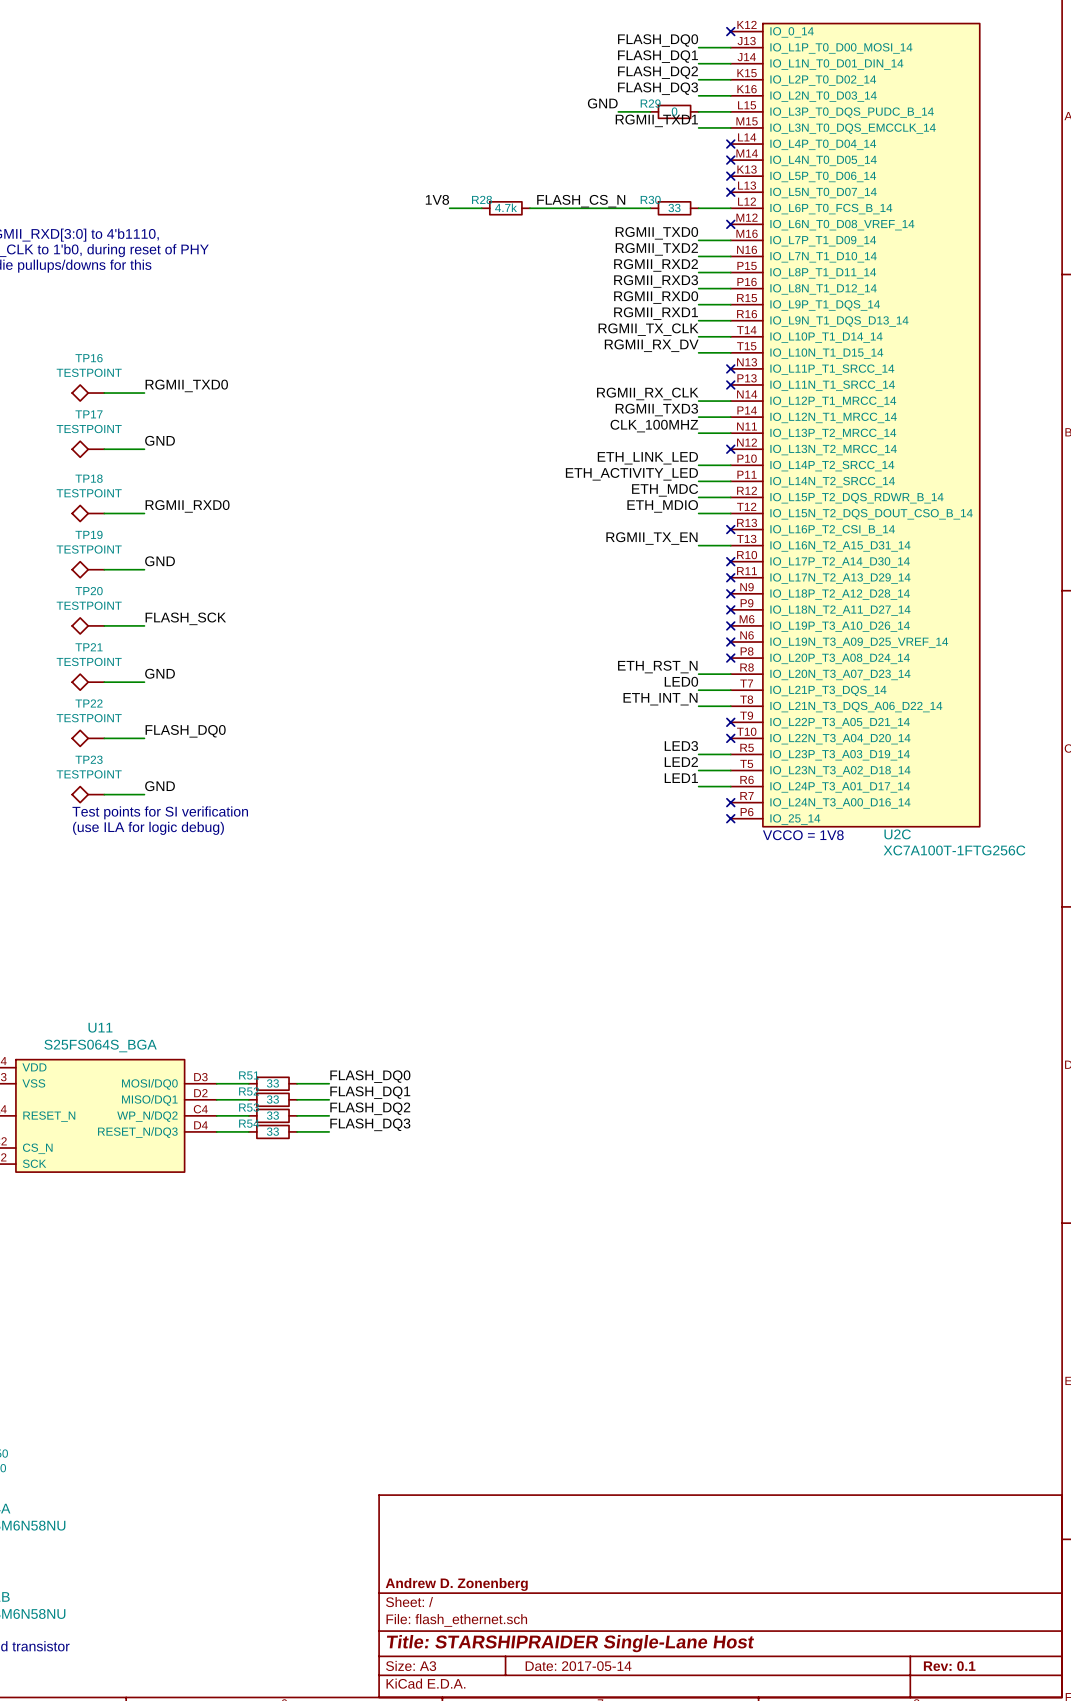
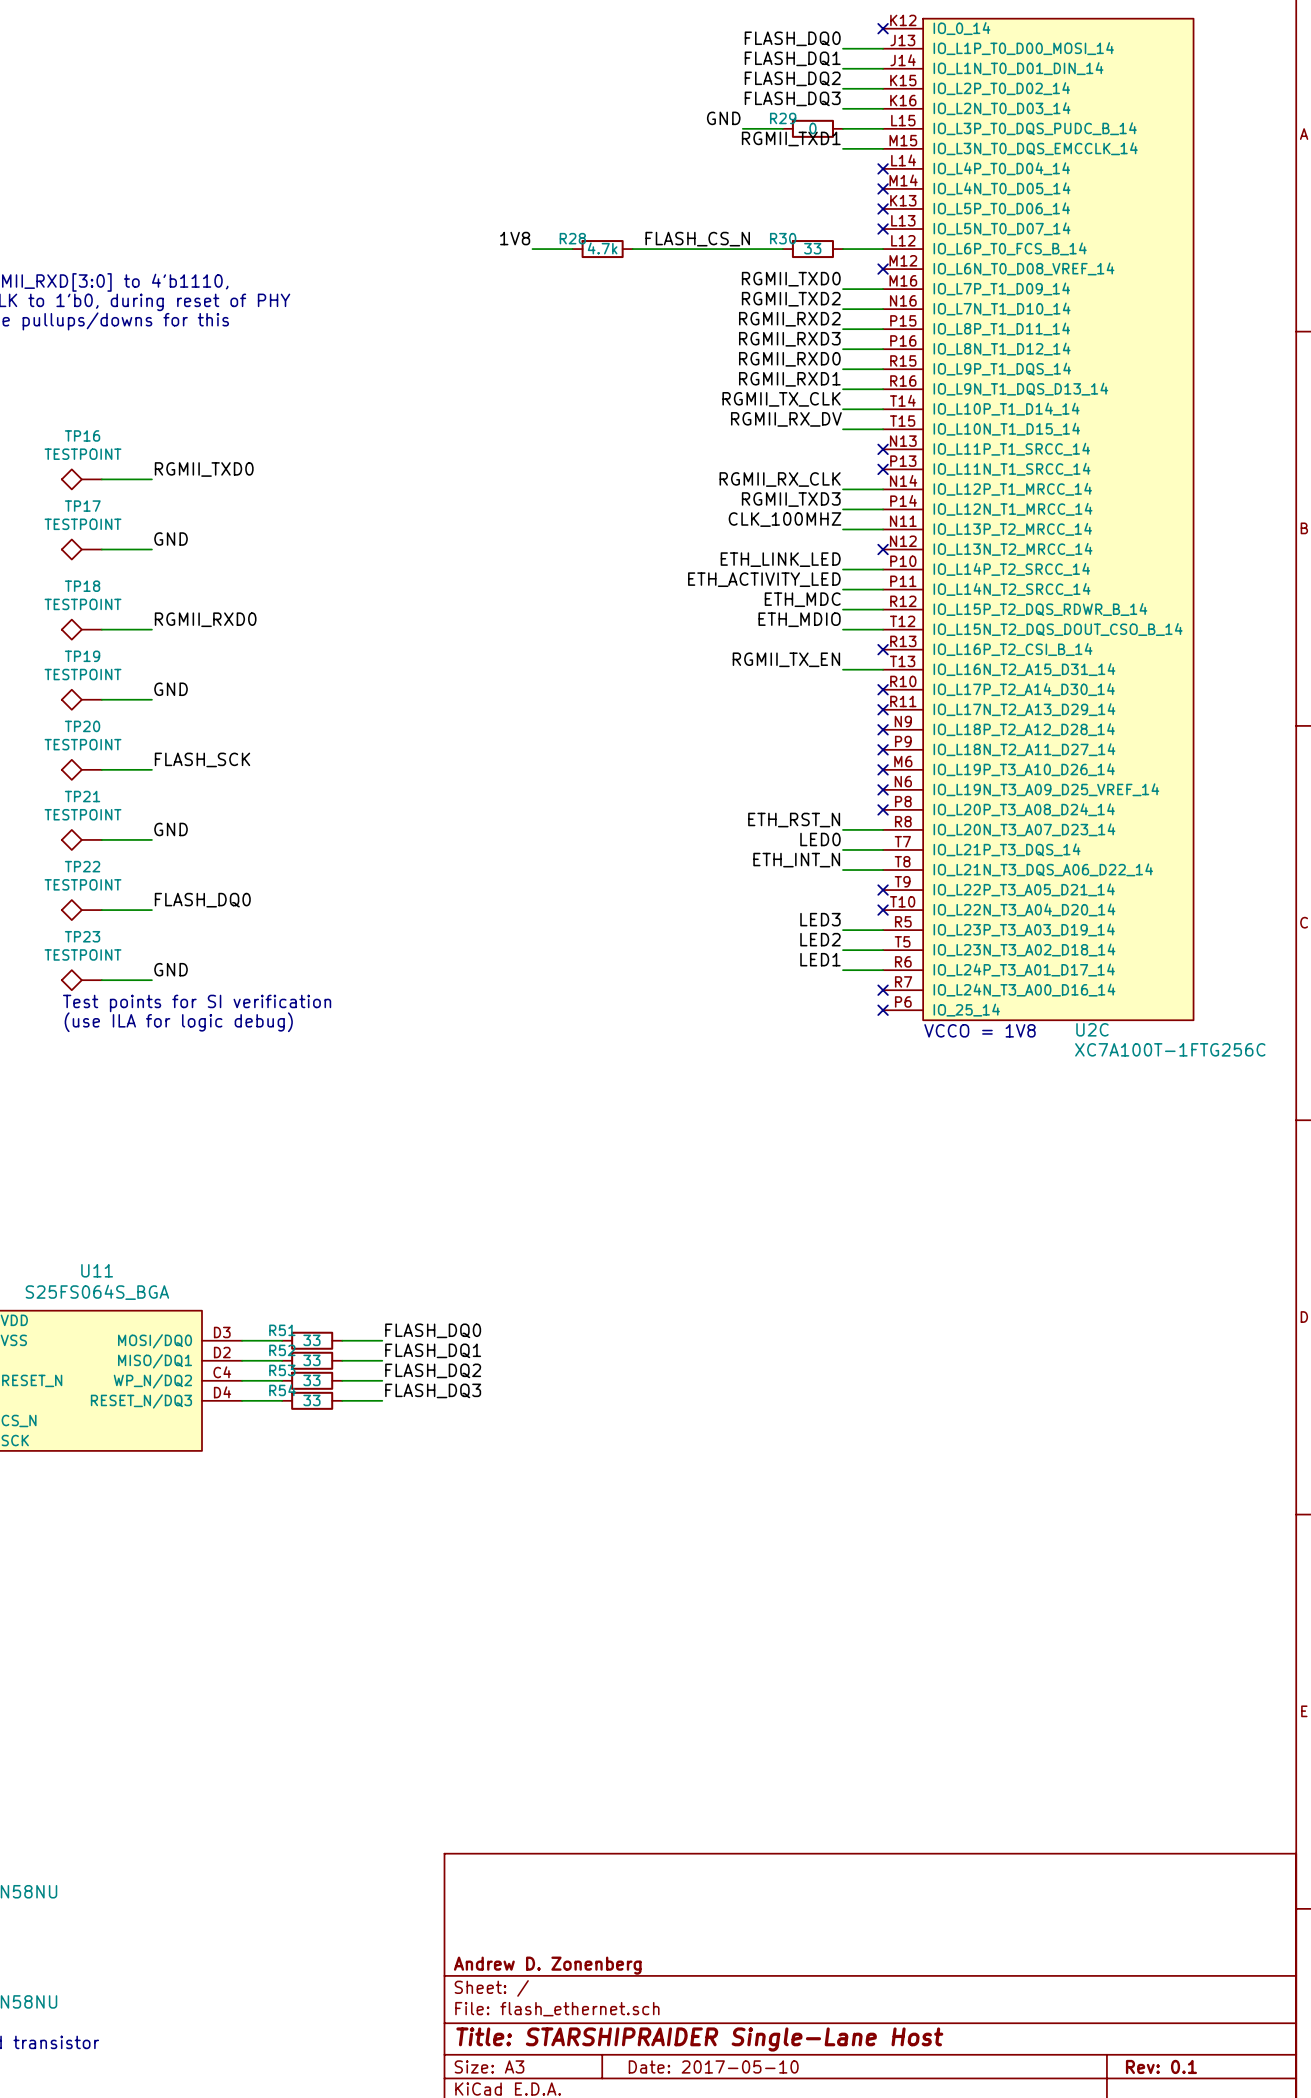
title block: Date: 2017-05-14 (578, 1666) -> Date: 2017-05-10 (713, 2066)

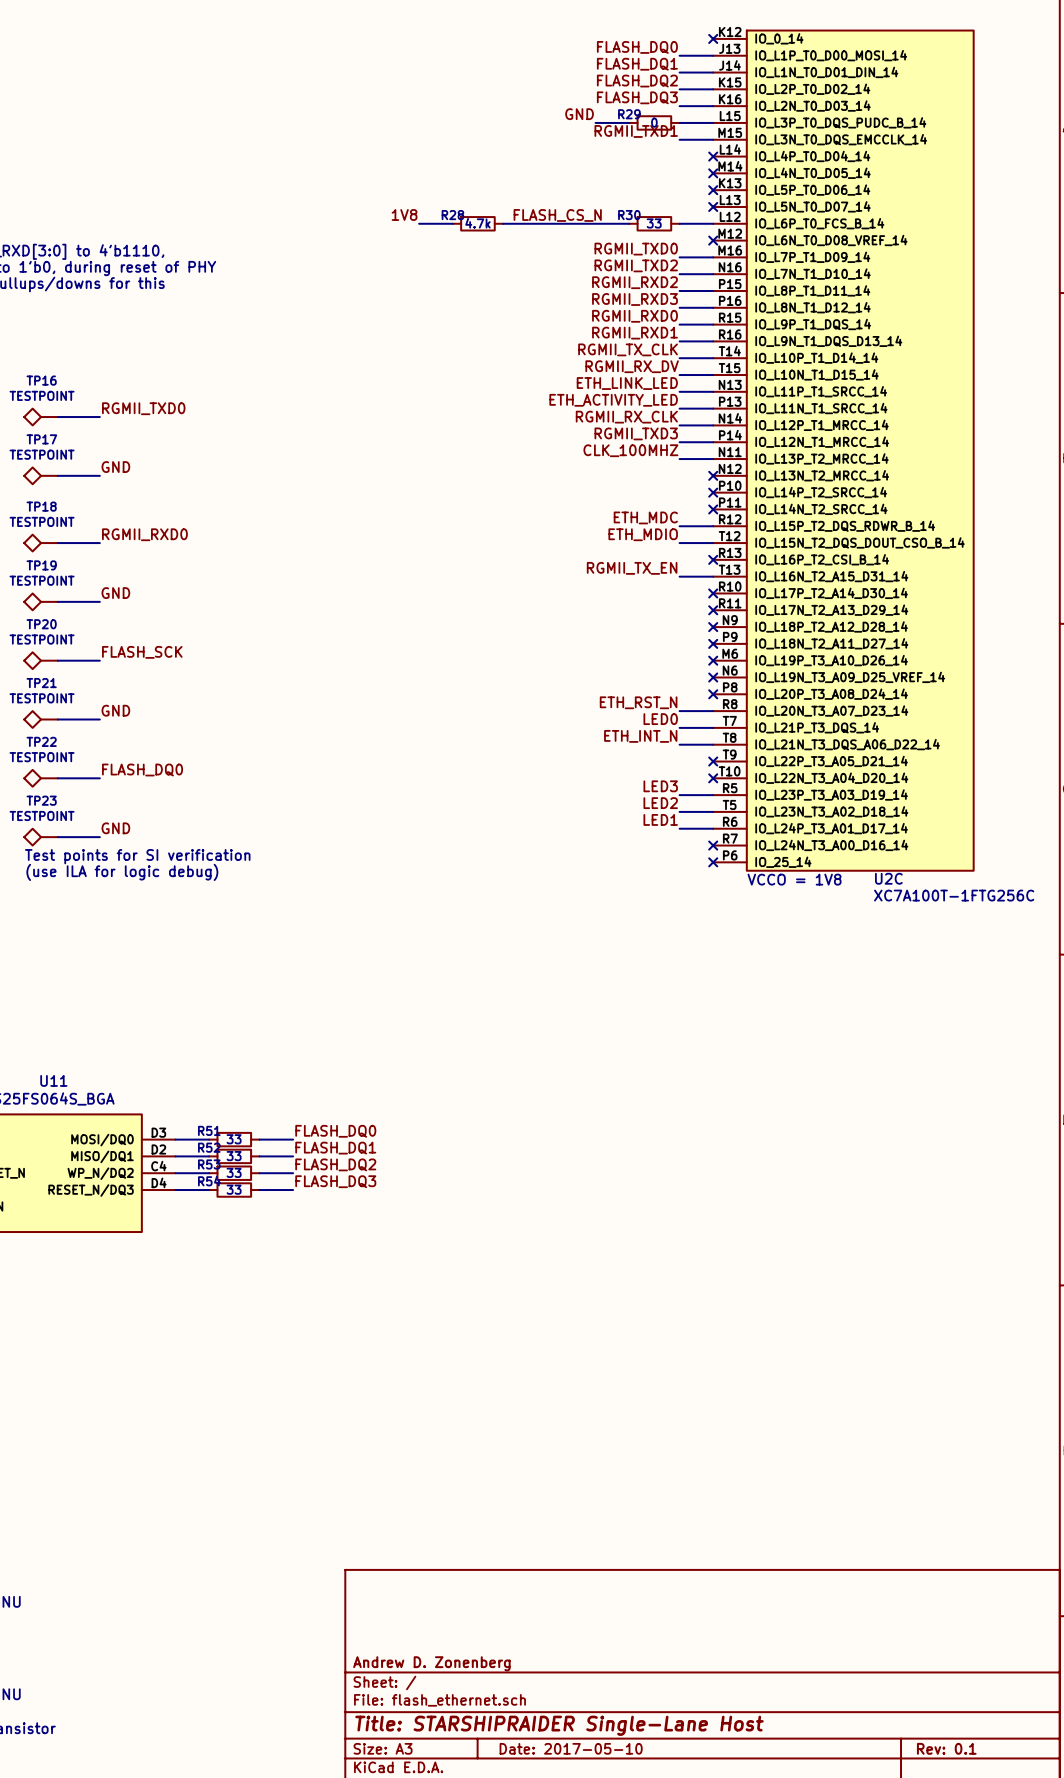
no-connect mark: (883, 449) -> none
no-connect mark: (883, 469) -> none
label position: ETH_LINK_LED (780, 559) -> ETH_LINK_LED (627, 383)
wire: (843, 569) (883, 569) -> (679, 408) (713, 408)
no-connect mark: none -> (713, 492)
label position: ETH_ACTIVITY_LED (764, 579) -> ETH_ACTIVITY_LED (613, 400)
wire: (843, 589) (883, 589) -> (679, 391) (713, 391)
no-connect mark: none -> (713, 509)

